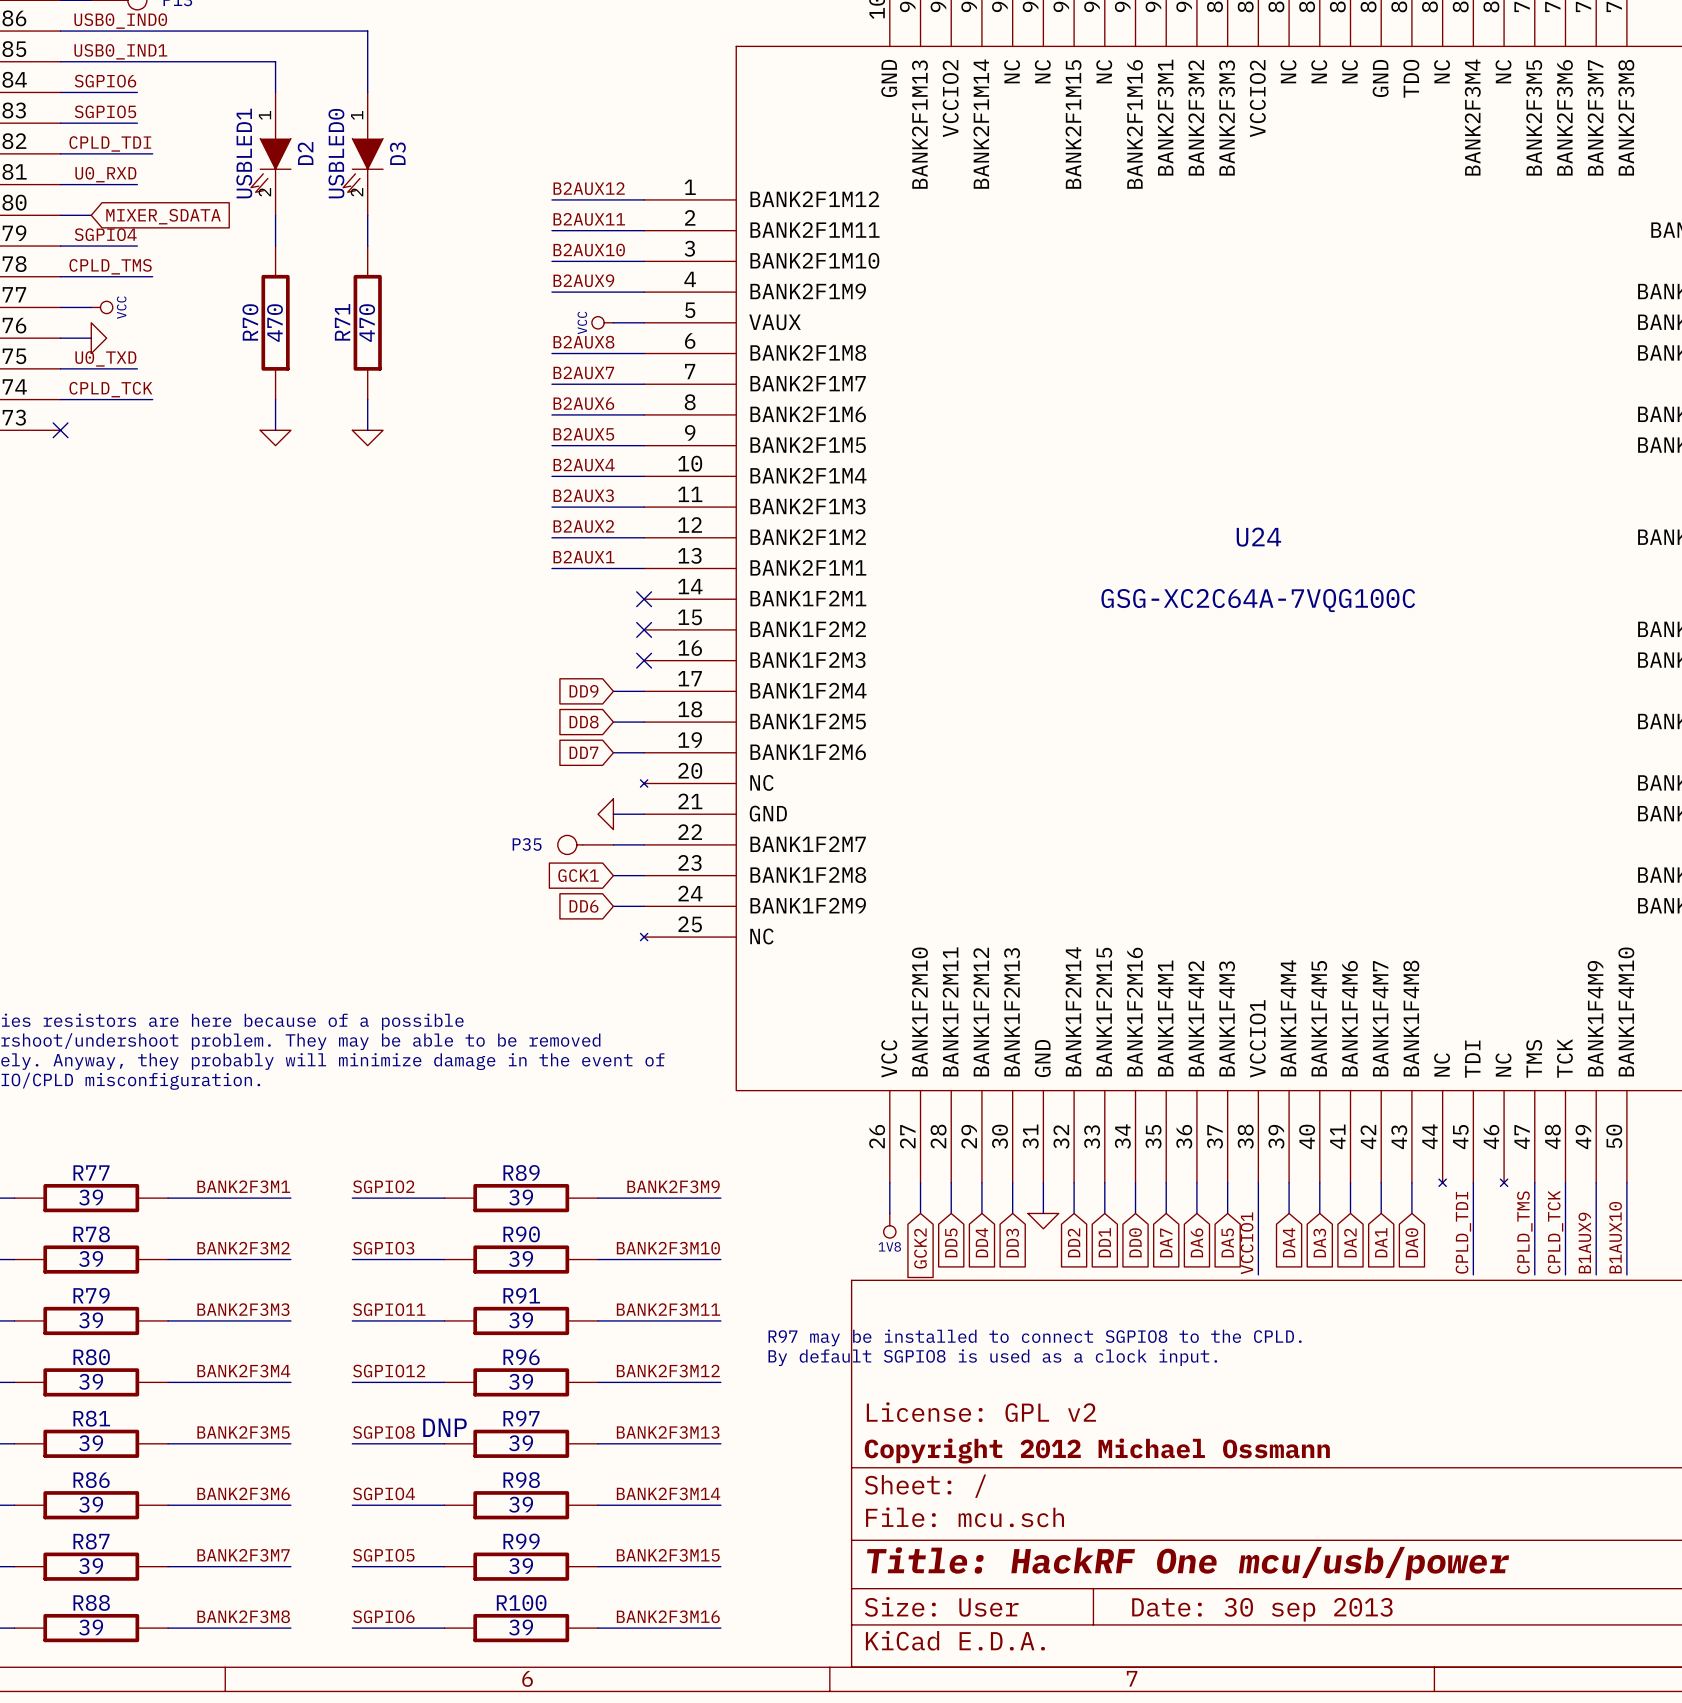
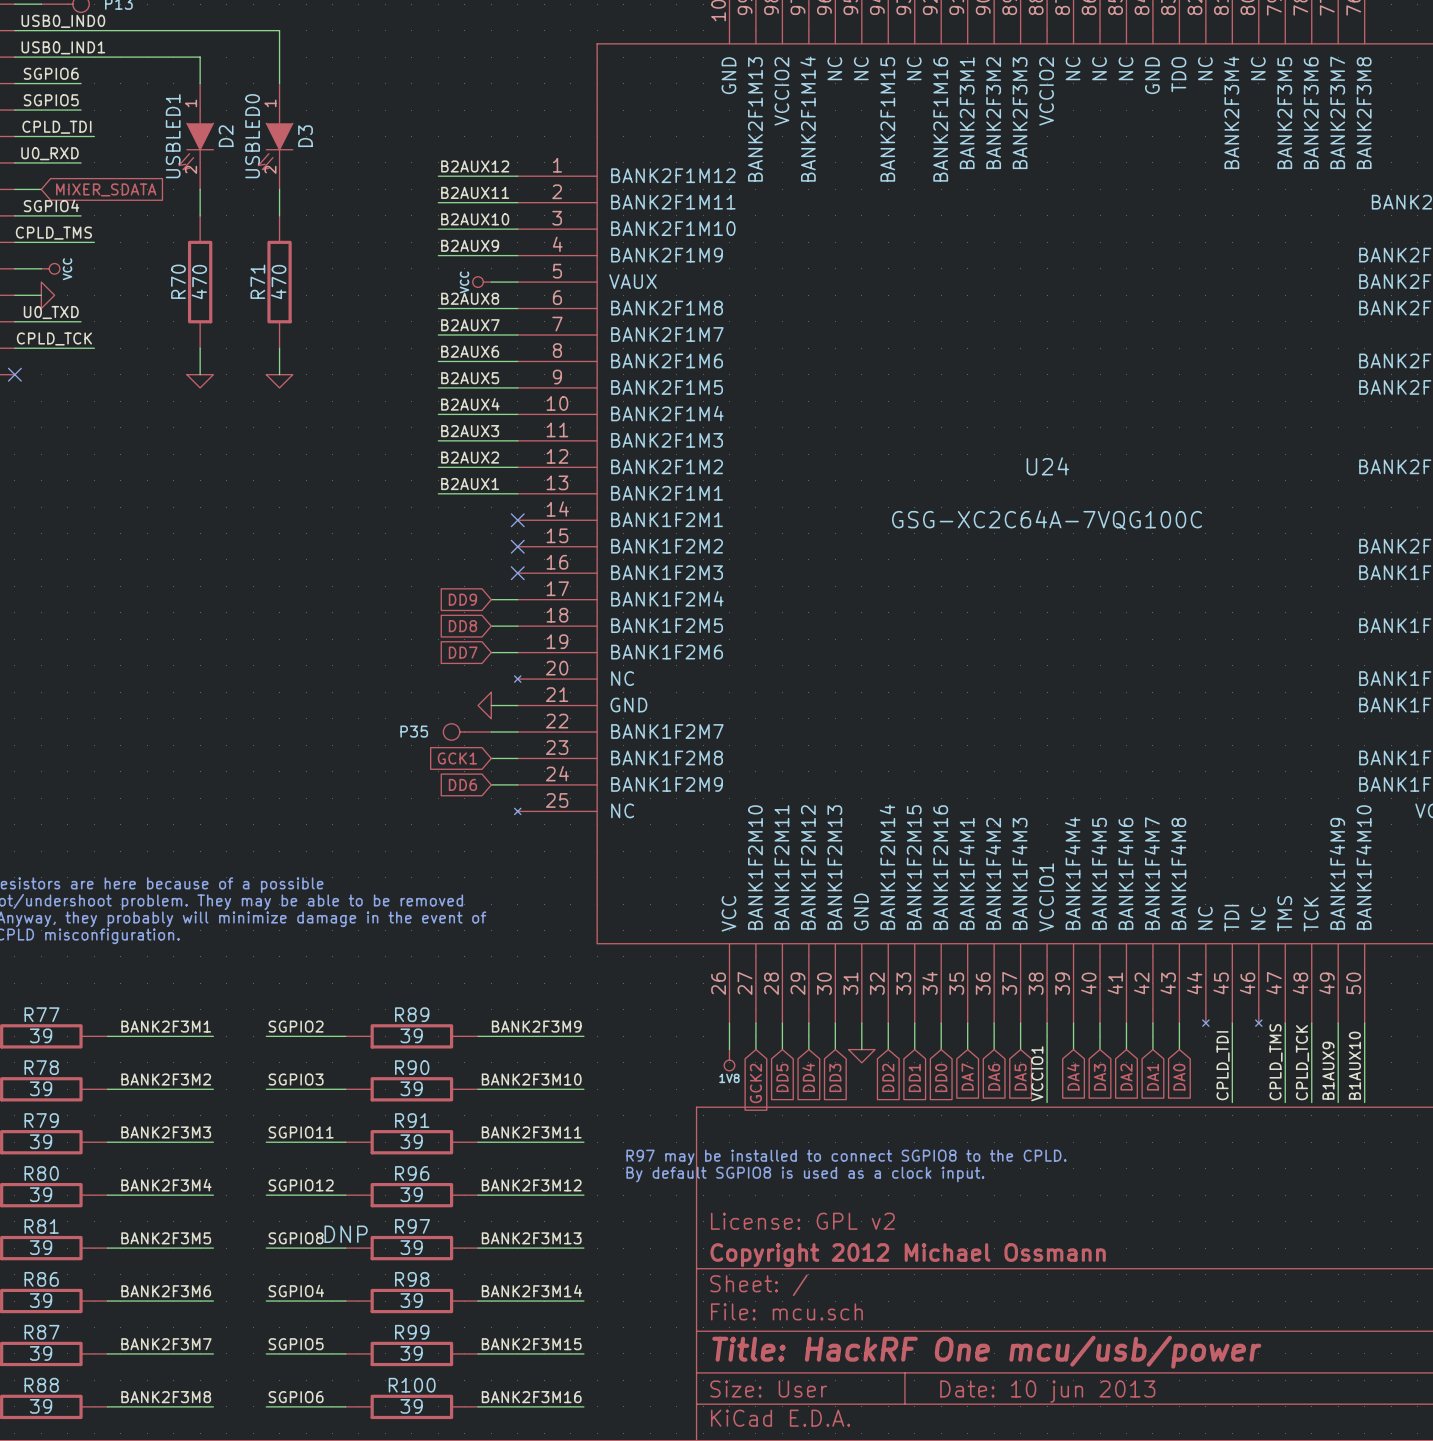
title block: Date: 30 sep 2013 (1262, 1609) -> Date: 10 jun 2013 (1047, 1391)

